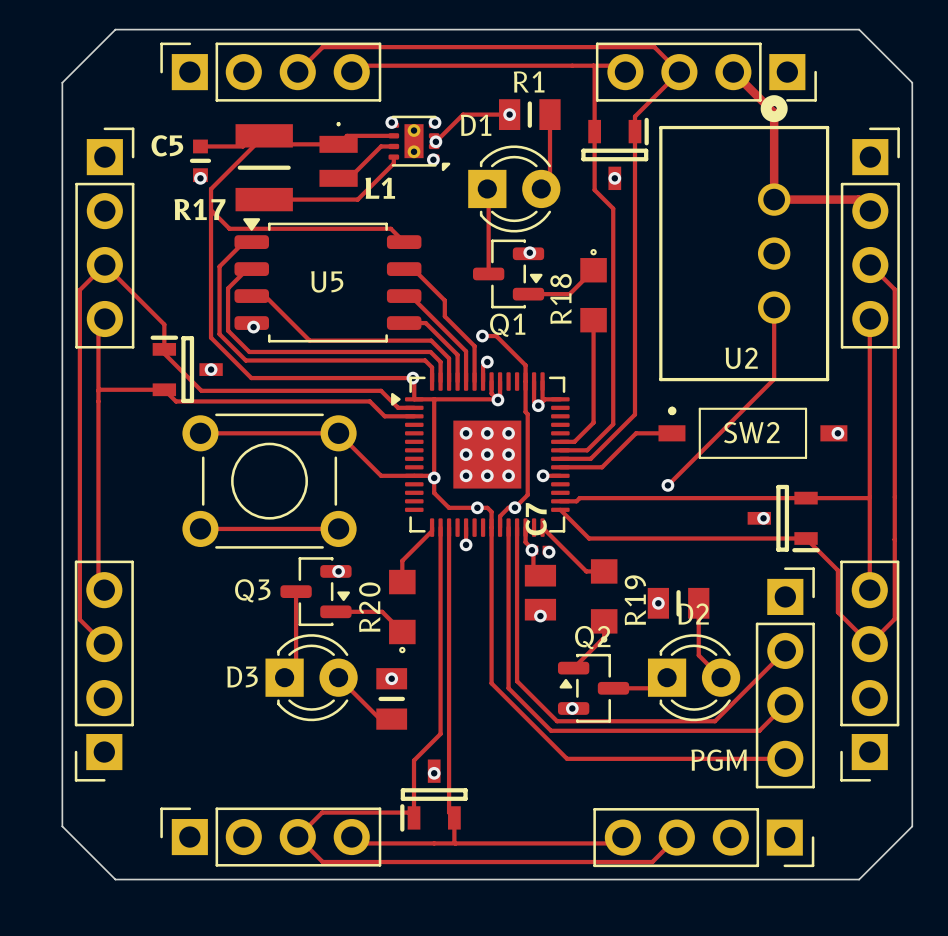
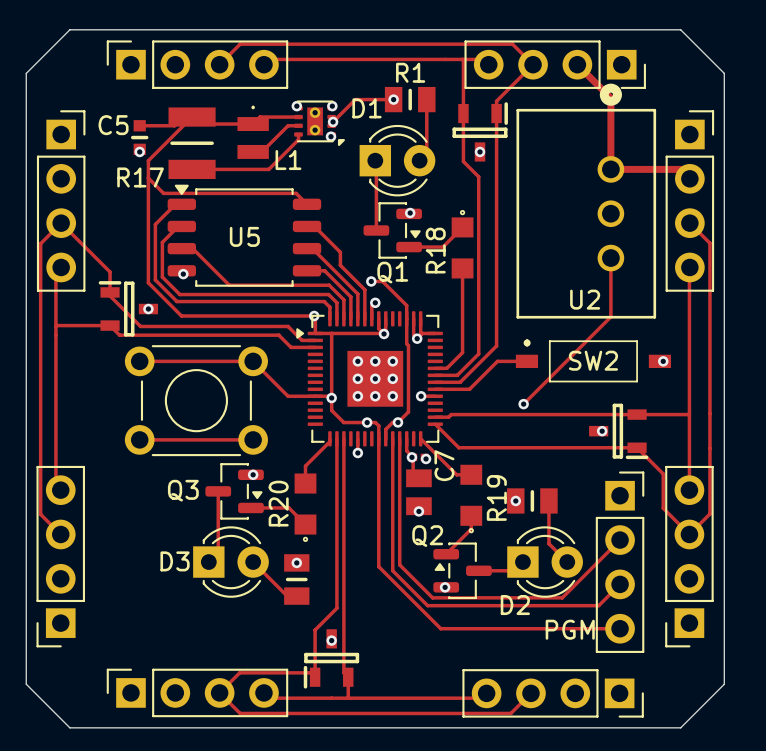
C7 name position: C7 (536, 519) -> C7 (444, 465)
D2 name position: D2 (693, 614) -> D2 (515, 605)
Q2 name position: Q2 (592, 637) -> Q2 (427, 536)

